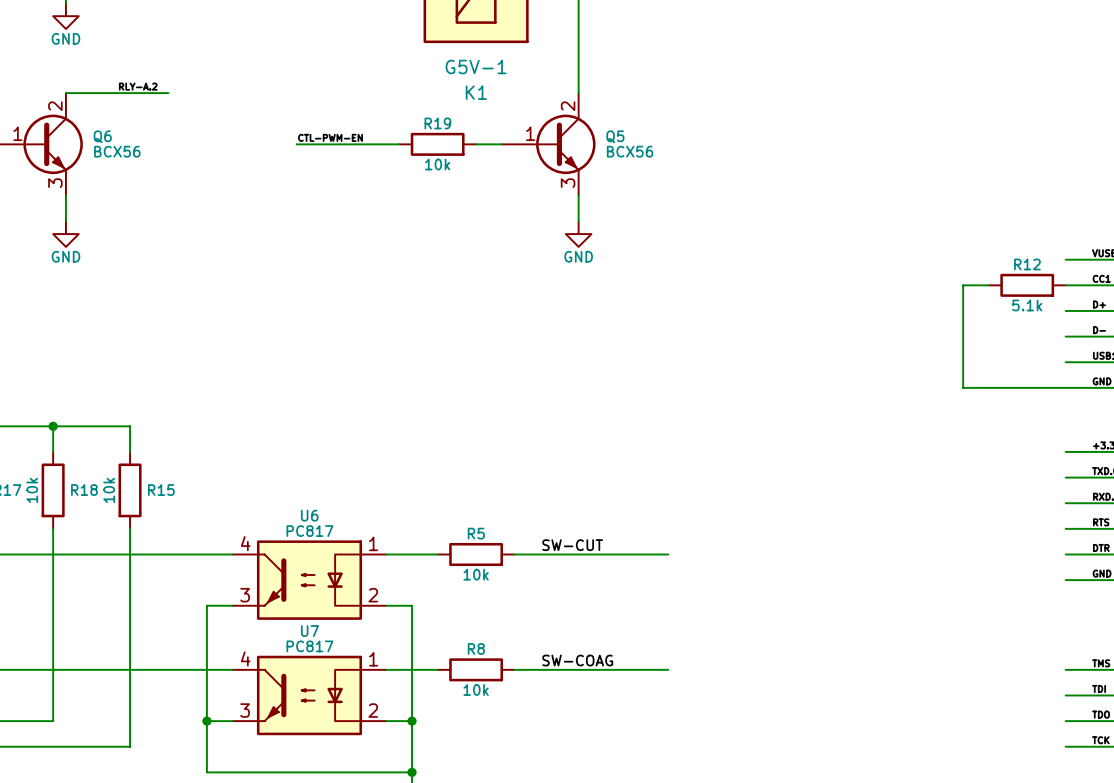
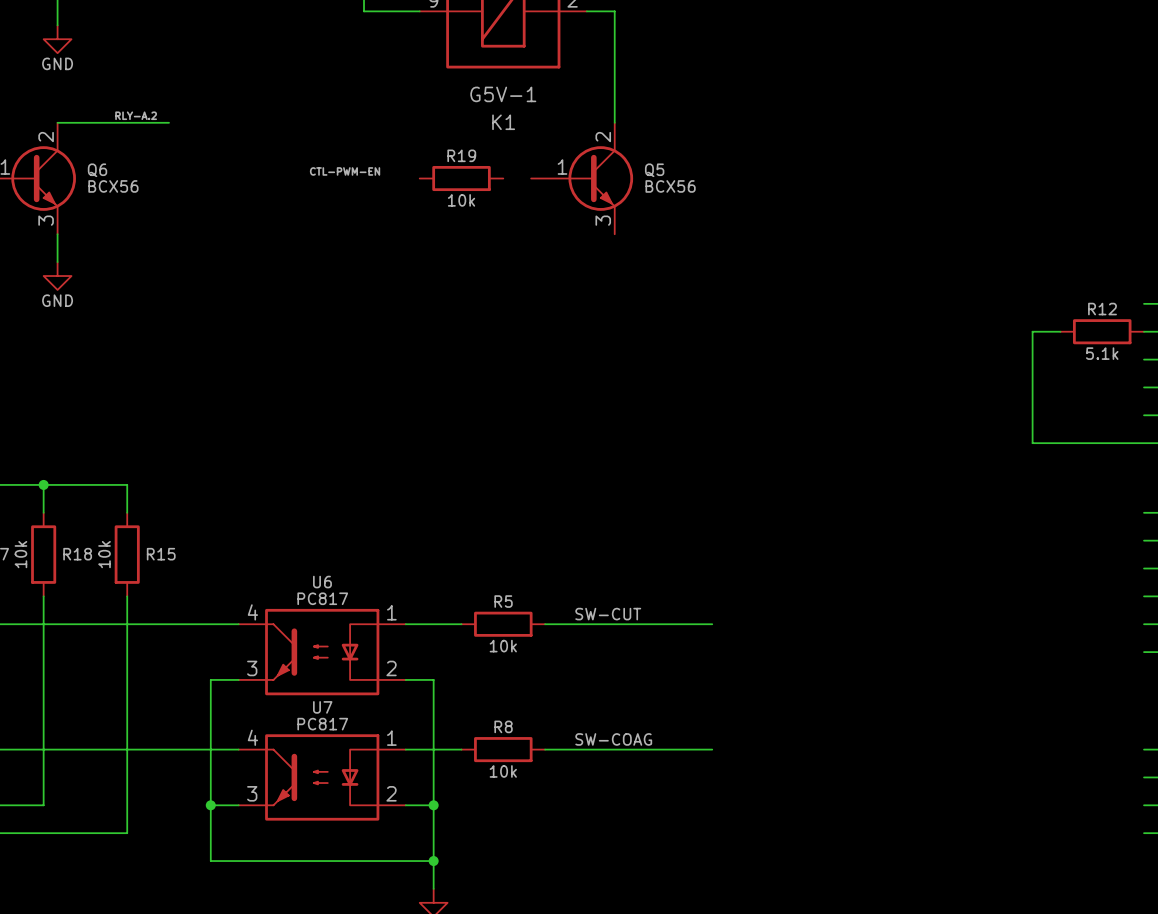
wire: (296, 144) (399, 144) -> none
wire: (476, 144) (501, 144) -> none
wire: (578, 195) (578, 221) -> none
power symbol: GND (578, 234) -> none

